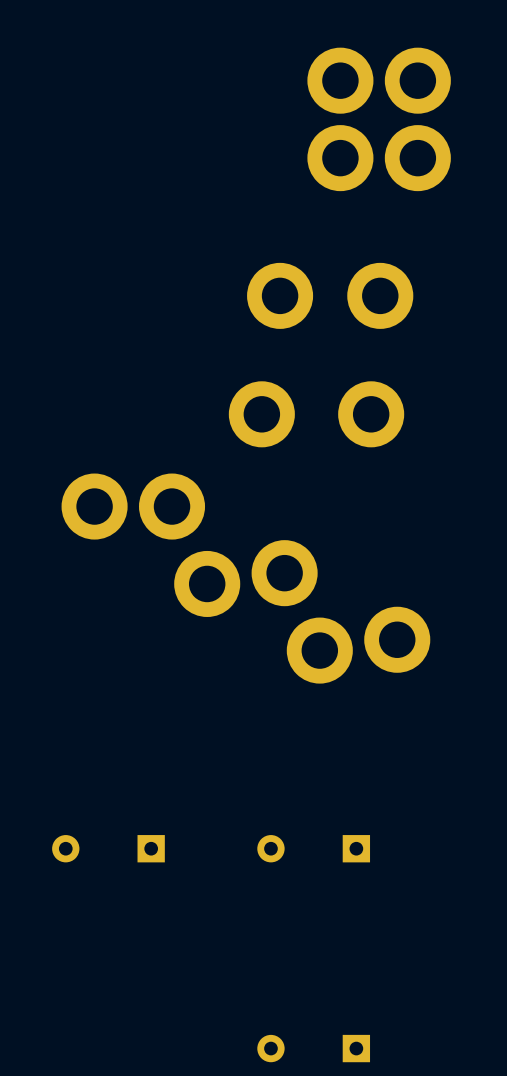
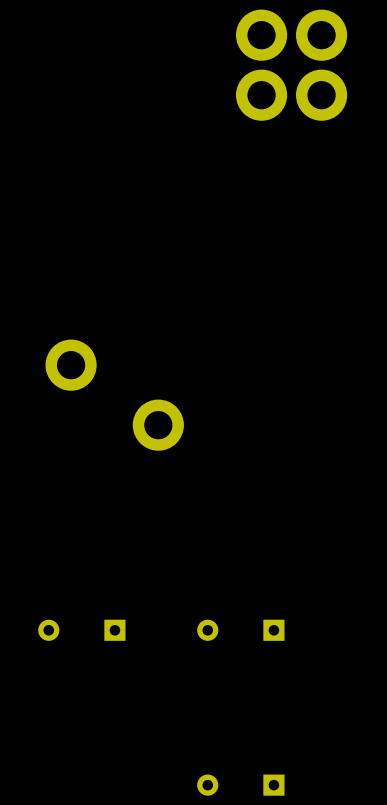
part: (280, 295) -> none
part: (380, 295) -> none
part: (261, 414) -> none
part: (371, 414) -> none
part: (172, 506) -> none
part: (284, 573) -> none
part: (397, 639) -> none
part: (319, 650) -> none

